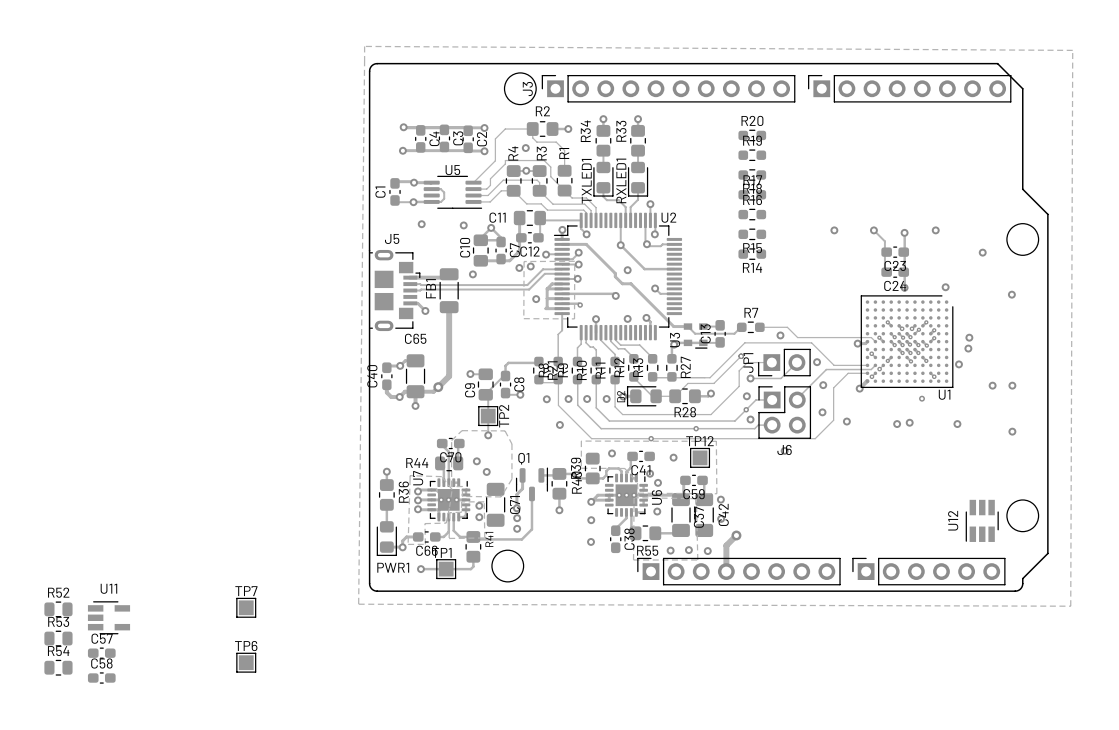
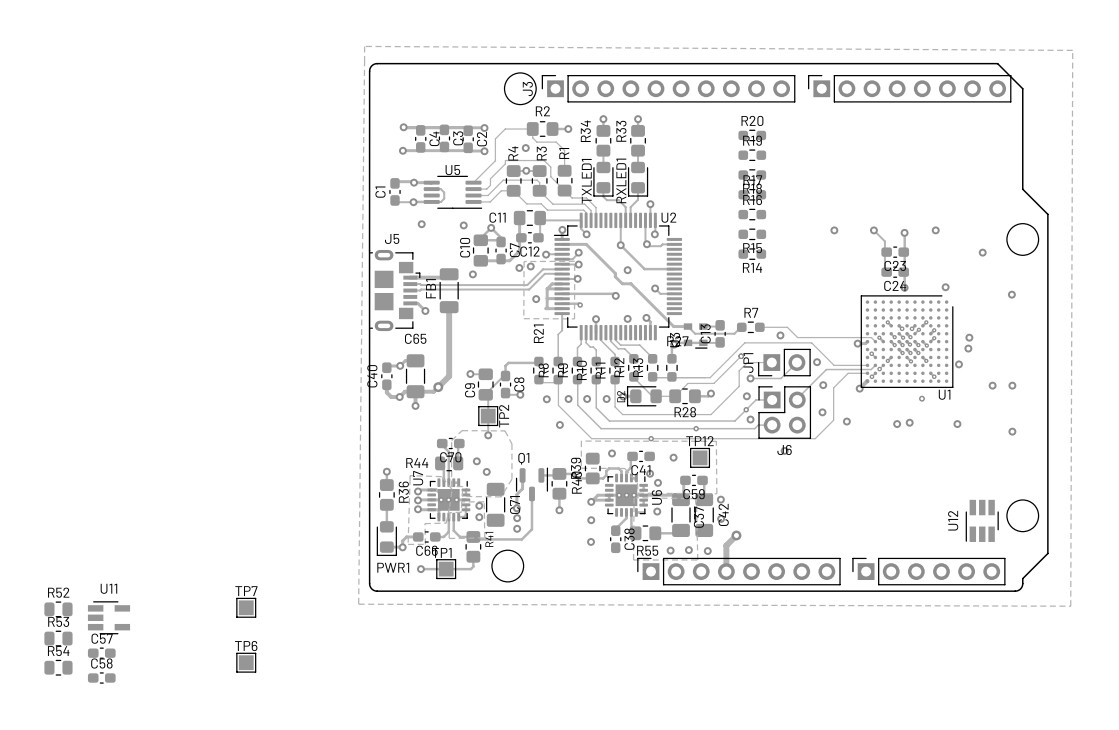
R27 name rotation: 0° (685, 367) -> 90° clockwise (677, 341)
R21 name position: R21 (552, 370) -> R21 (538, 333)

